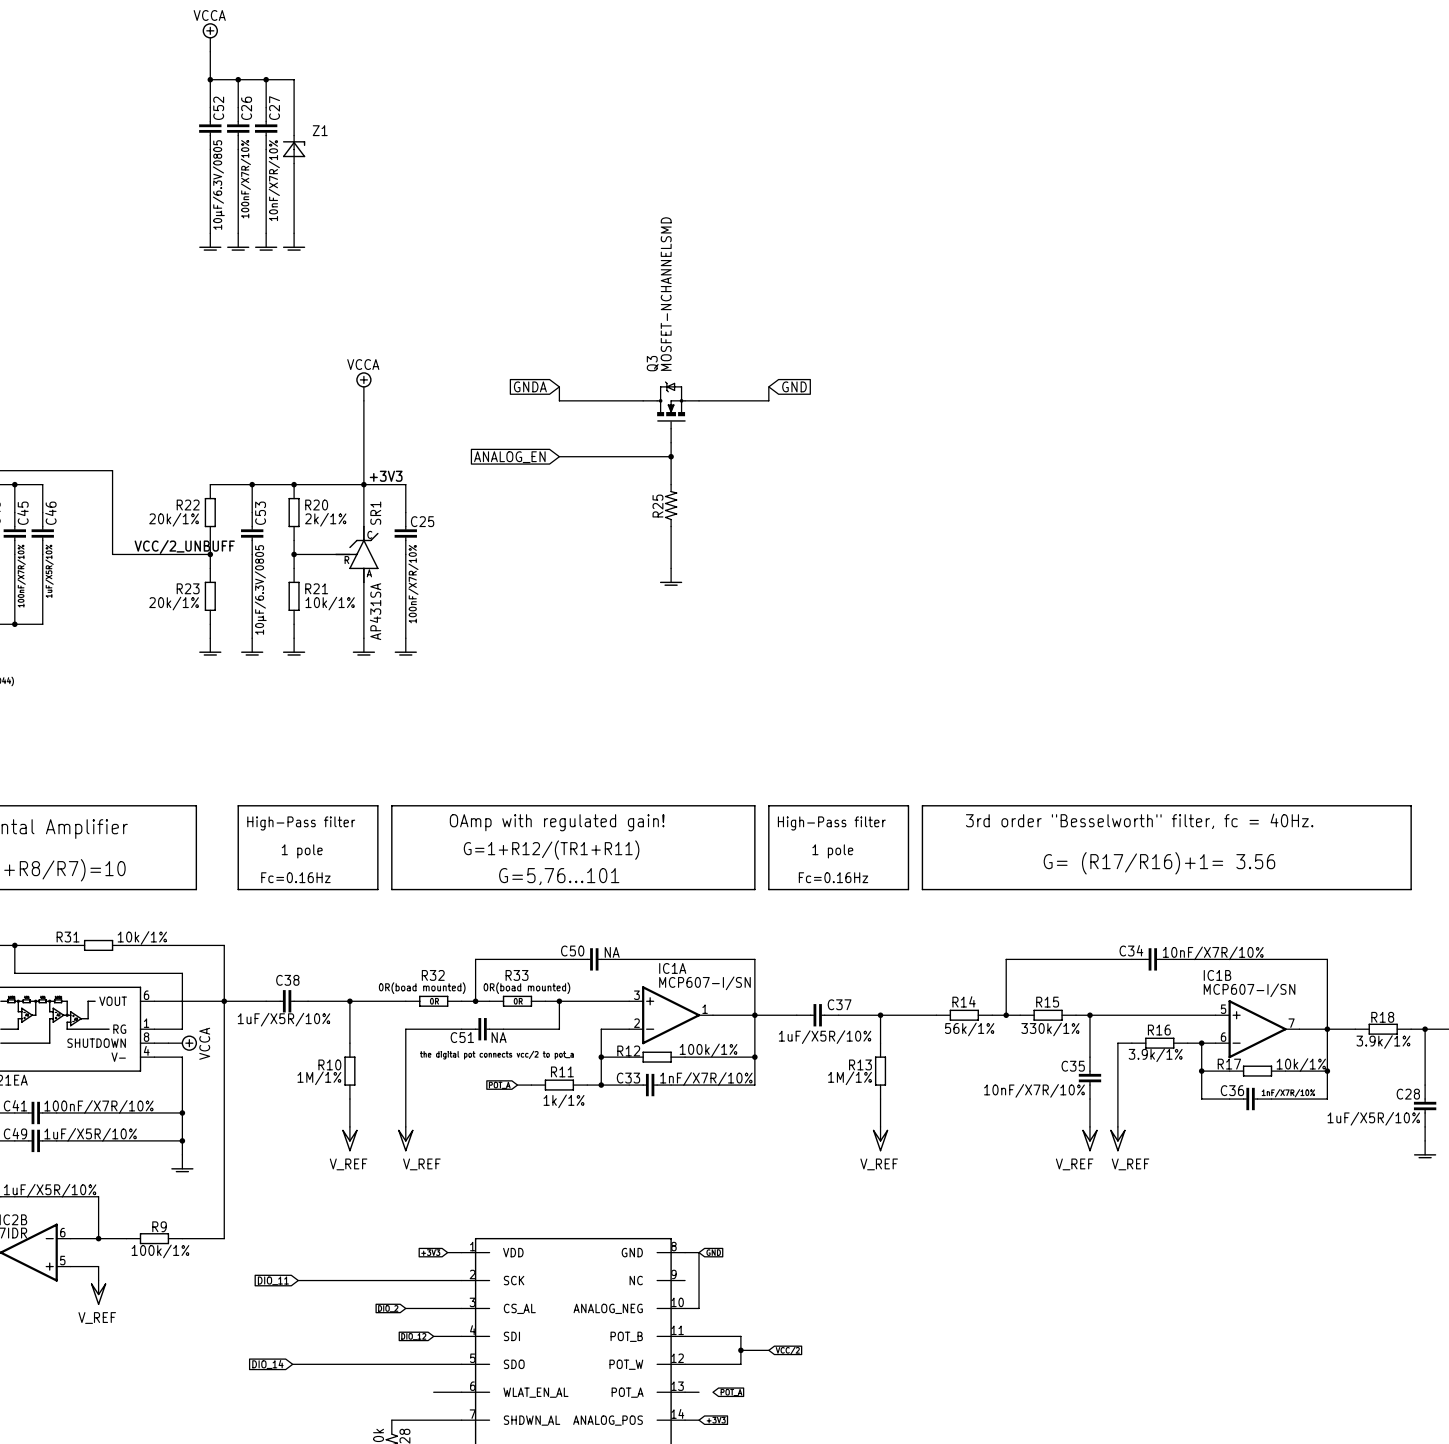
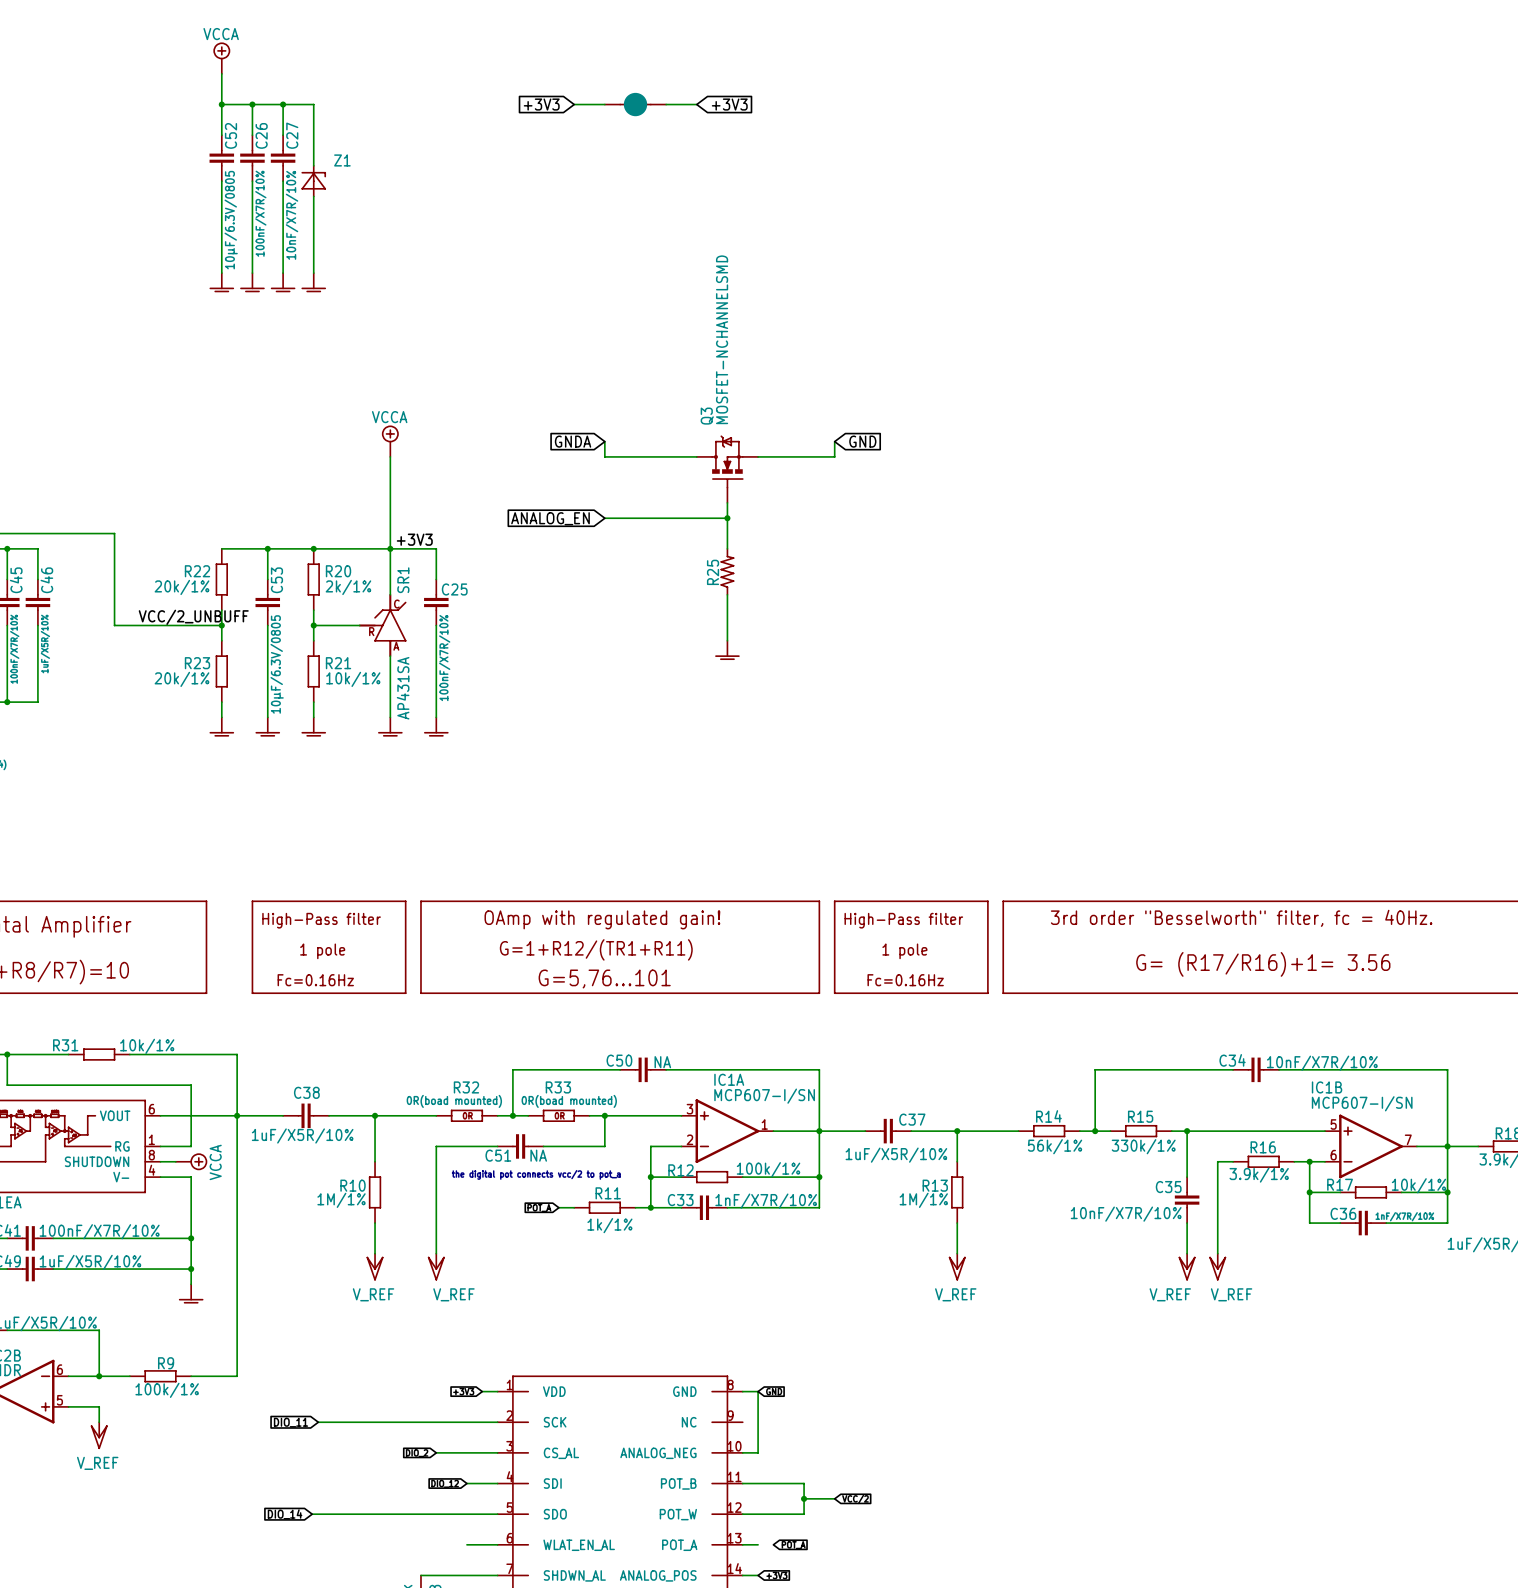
global label: none -> +3V3 (541, 104)
wire: none -> (574, 104) (604, 104)
part: none -> (635, 104)
wire: none -> (666, 104) (696, 104)
global label: none -> +3V3 (729, 104)

